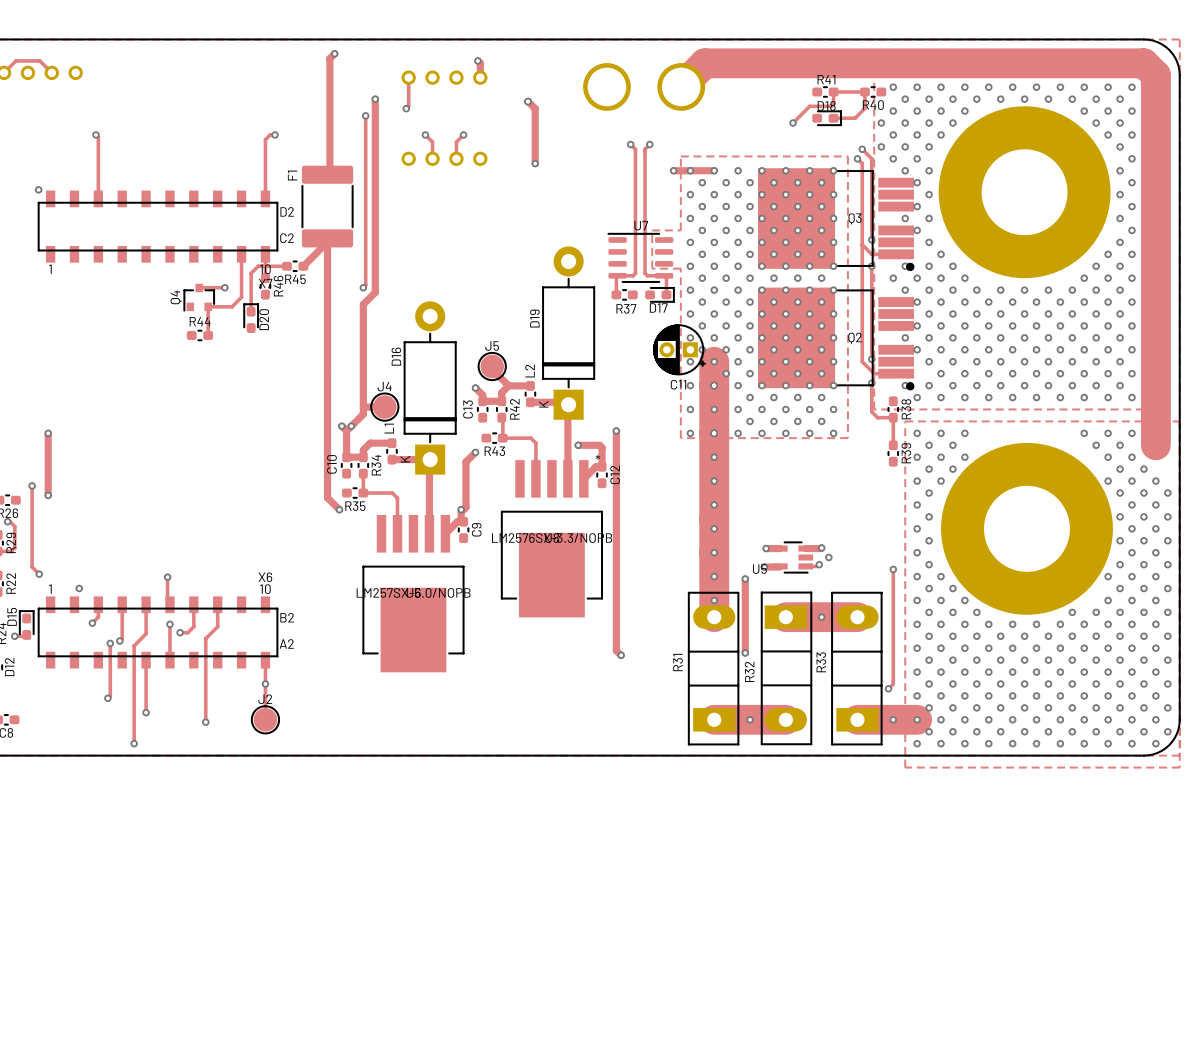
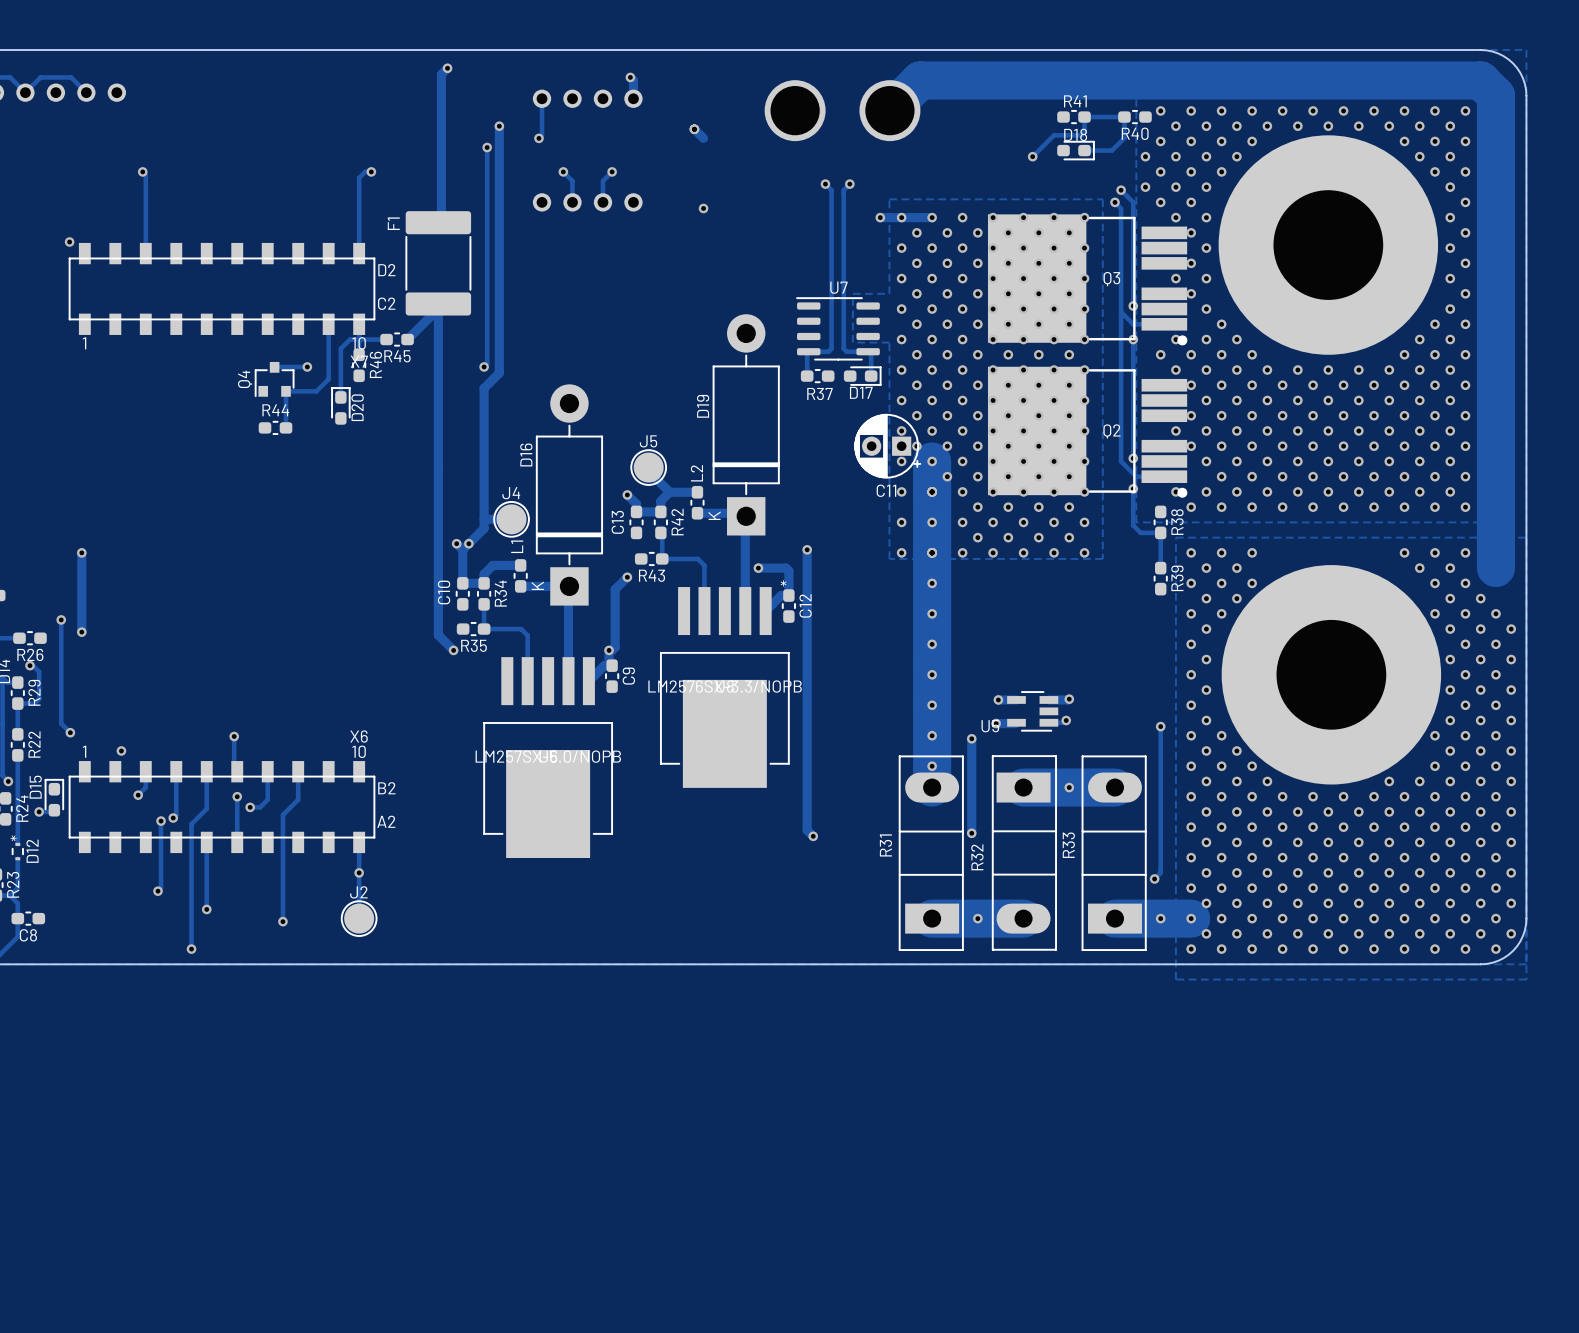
track: (535, 108) (535, 163) -> none
via: (828, 557) -> none

